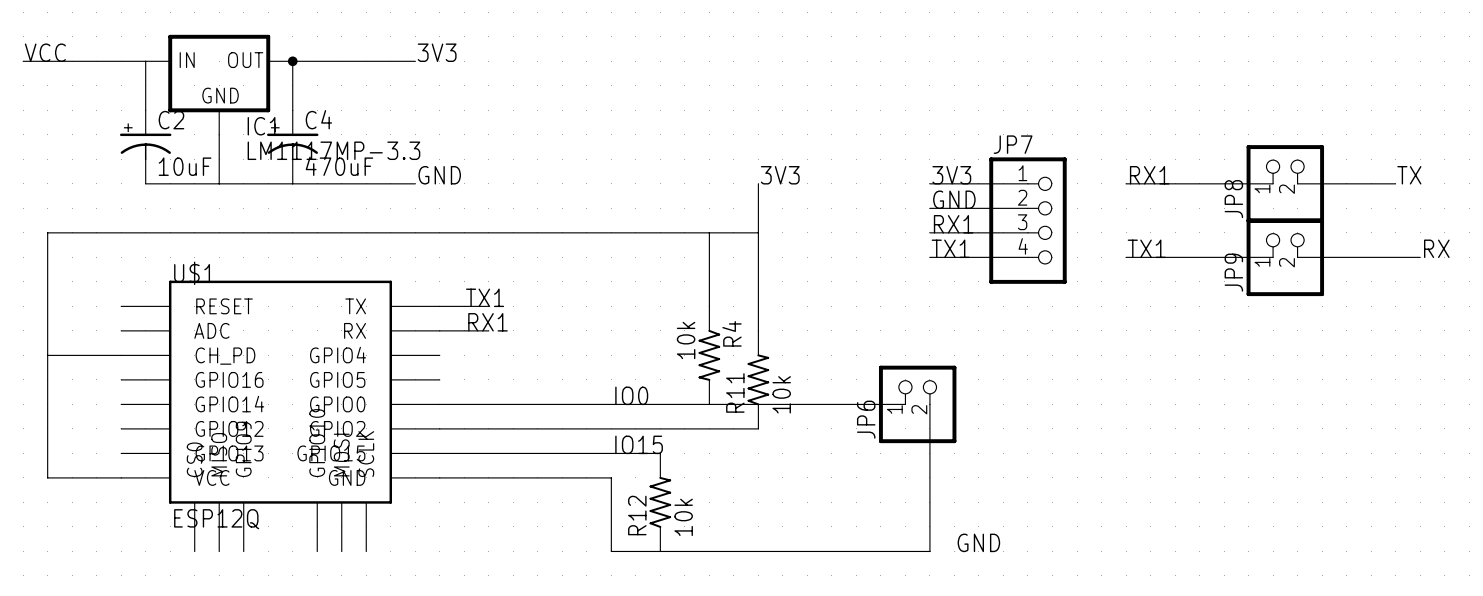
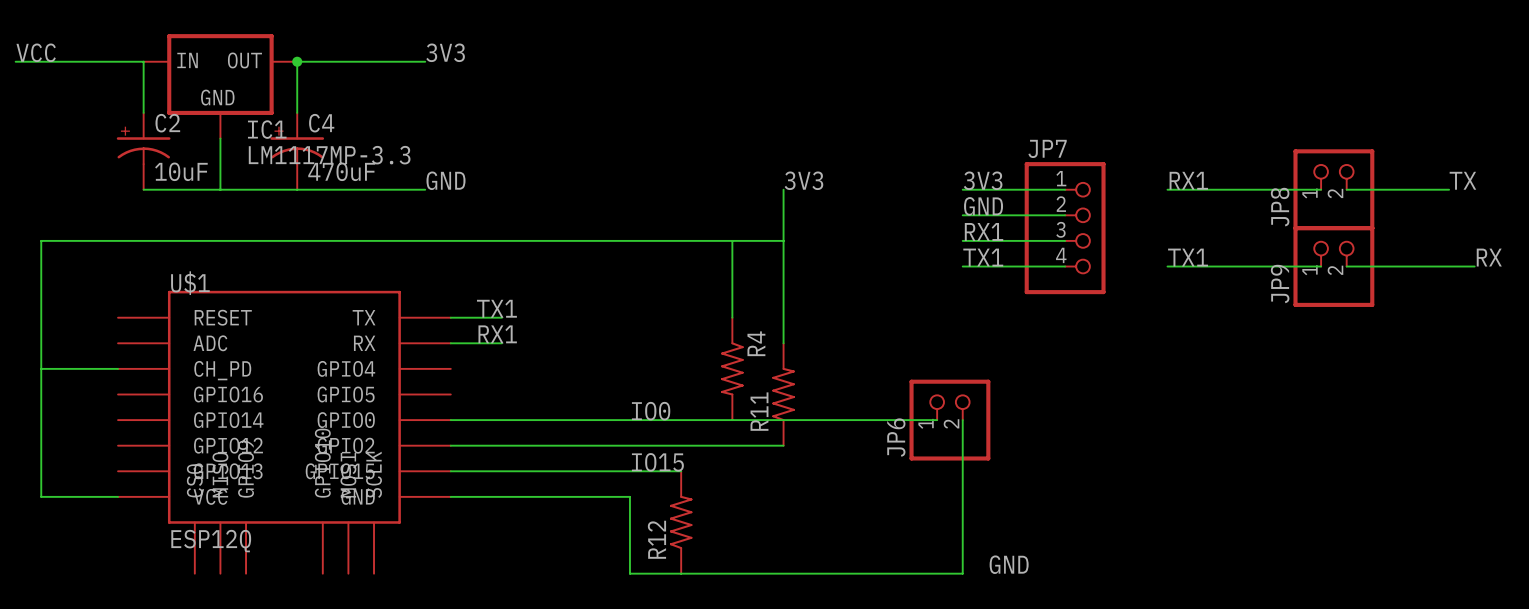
R4 value: 10k (686, 340) -> none
R11 value: 10k (781, 394) -> none
R12 value: 10k (683, 517) -> none

